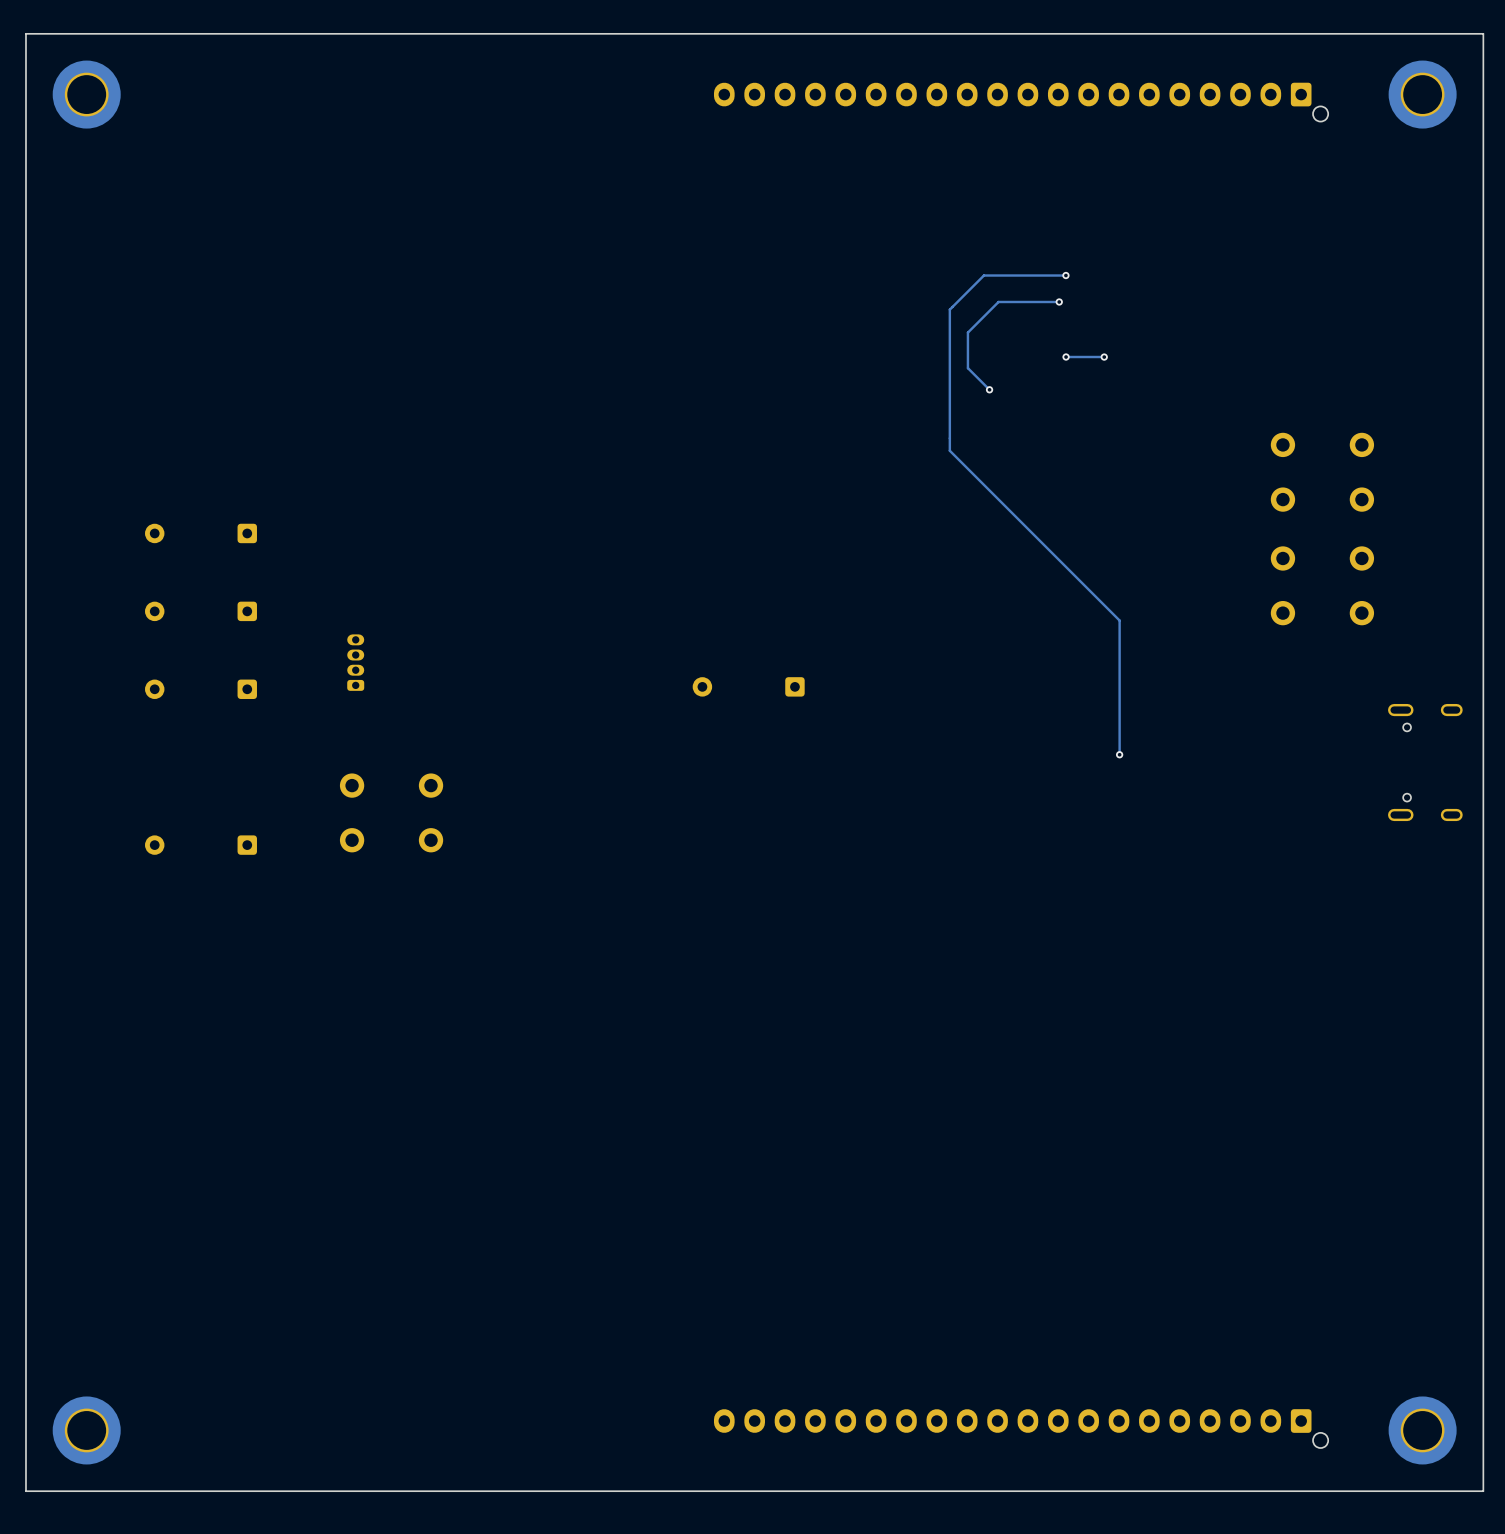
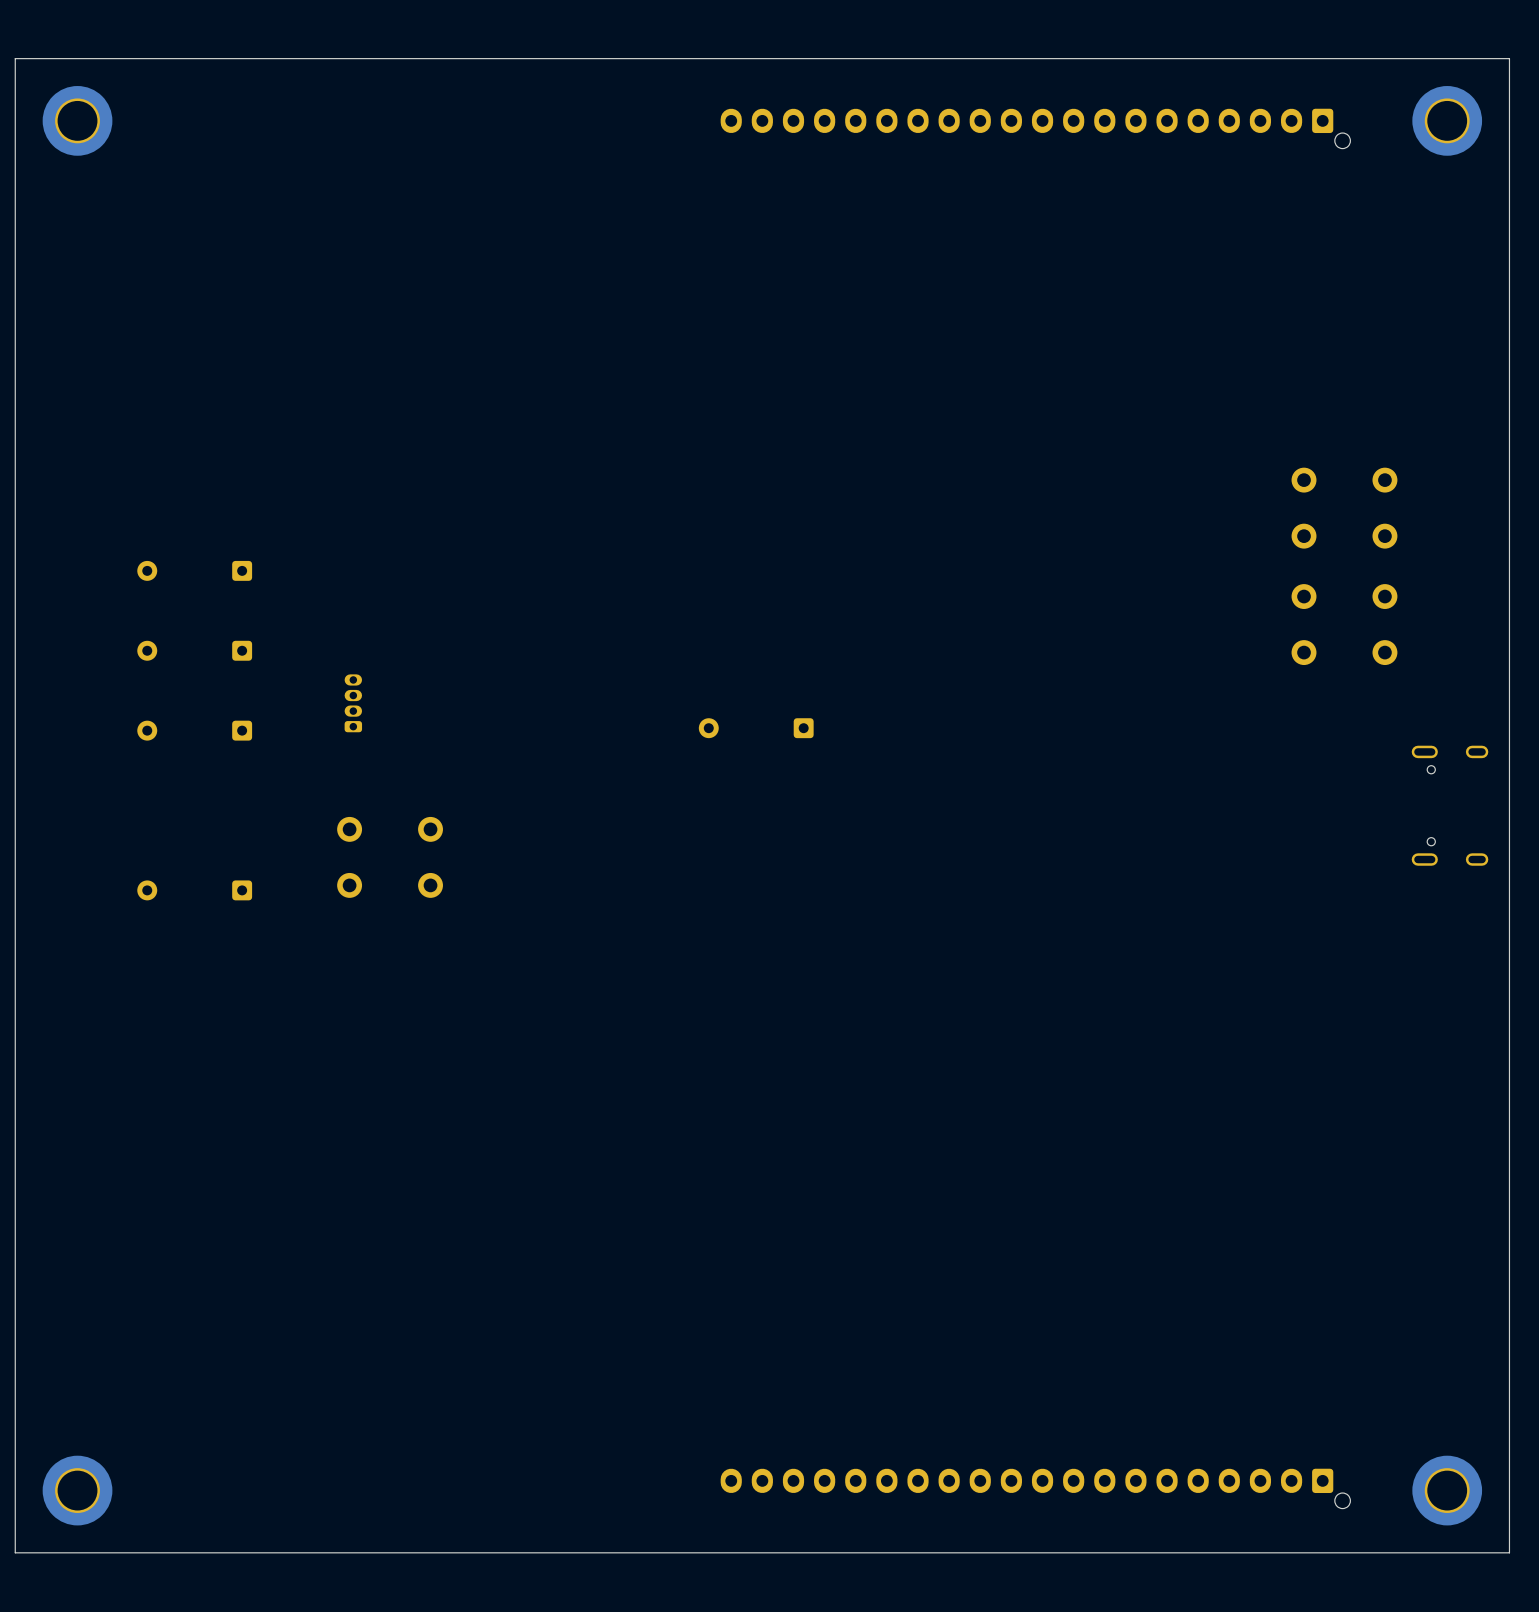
track: (1065, 275) (983, 275) (949, 309) (949, 450) (1119, 620) (1119, 754) -> none
via: (1065, 275) -> none
track: (1059, 301) (998, 301) (967, 332) (967, 368) (989, 389) -> none
via: (1059, 301) -> none
via: (1066, 357) -> none
track: (1104, 357) (1066, 357) -> none
via: (1104, 357) -> none
via: (989, 389) -> none
via: (1119, 754) -> none

